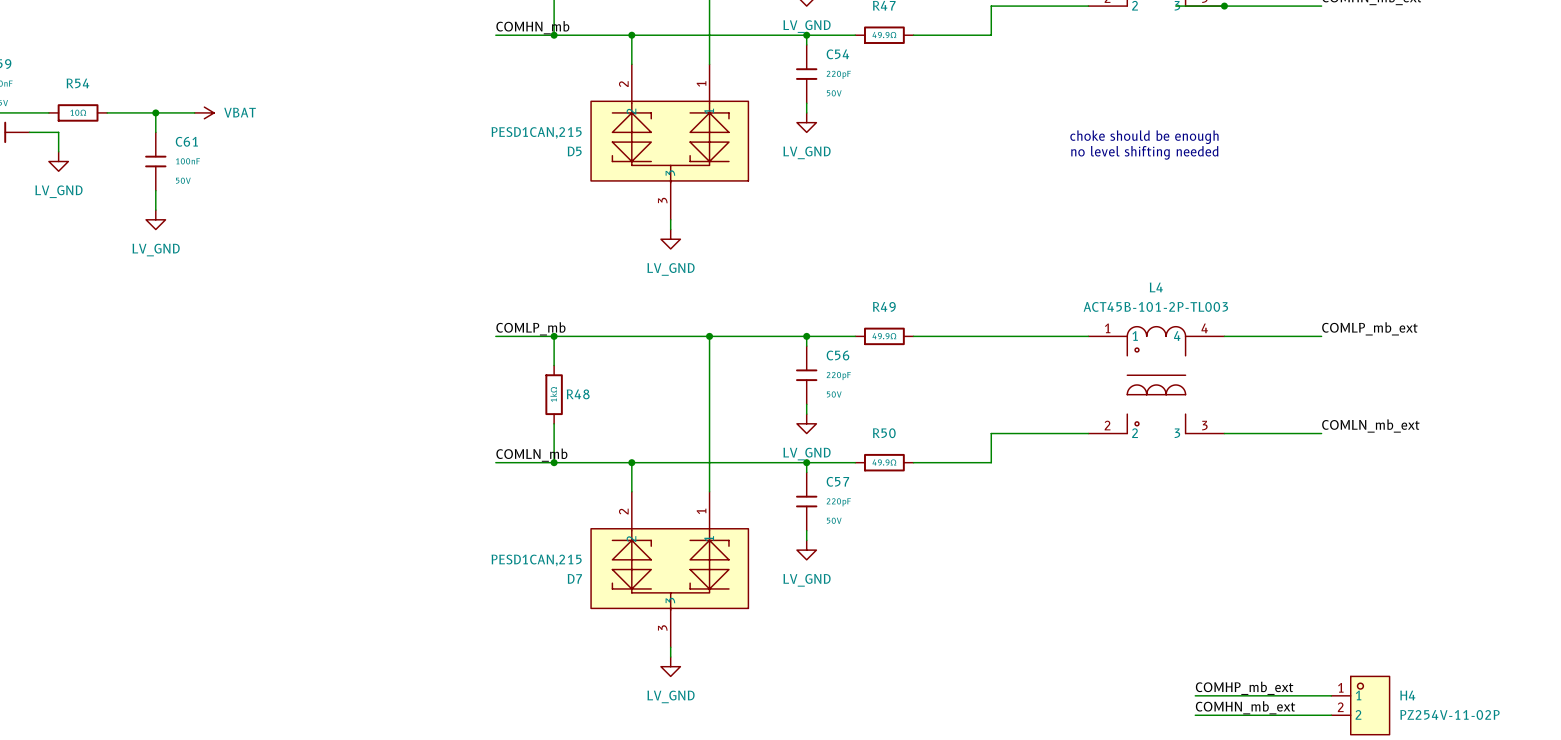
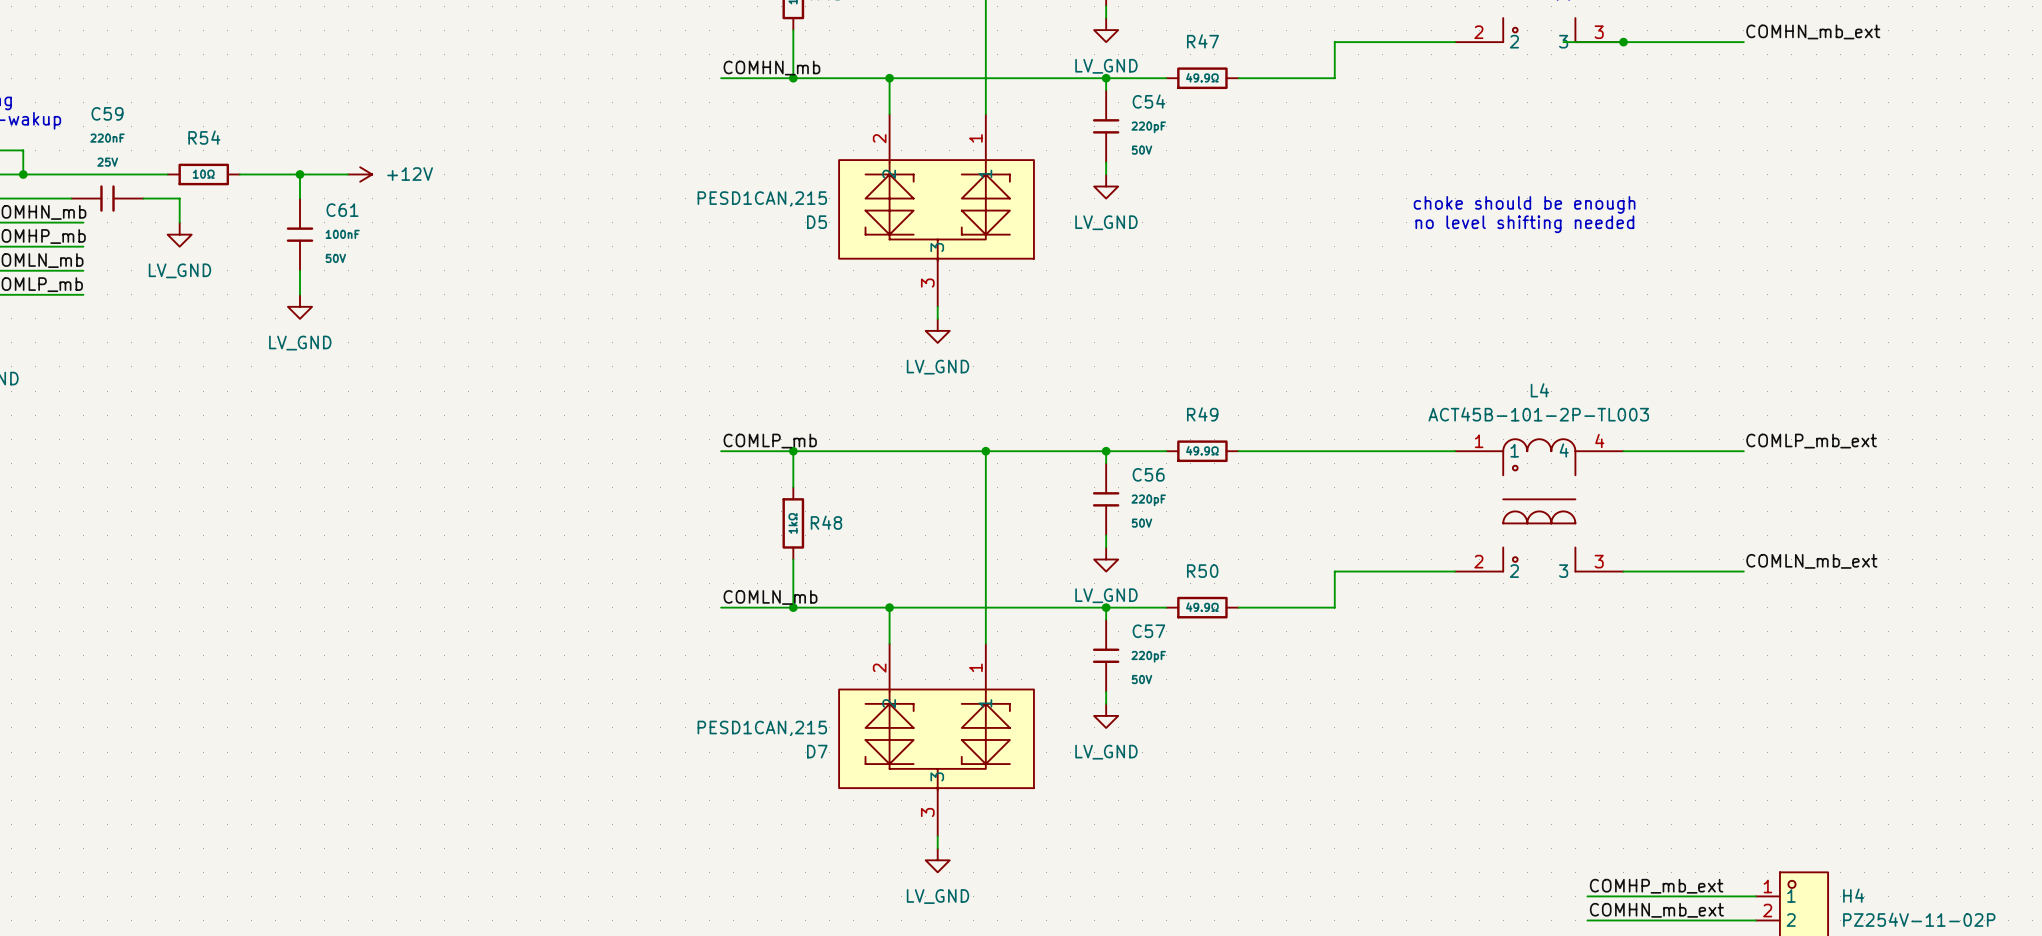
power symbol: VBAT (204, 112) -> +12V (360, 174)

